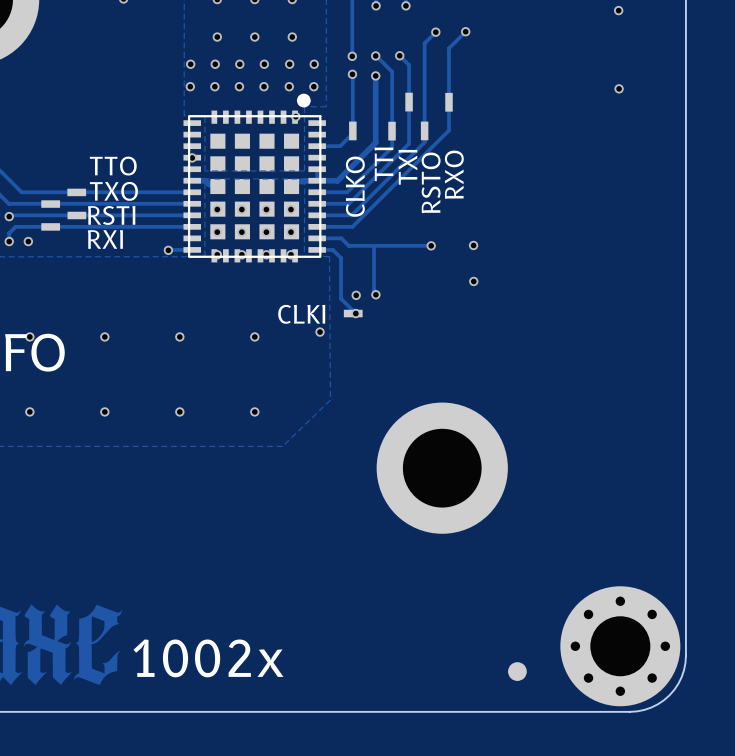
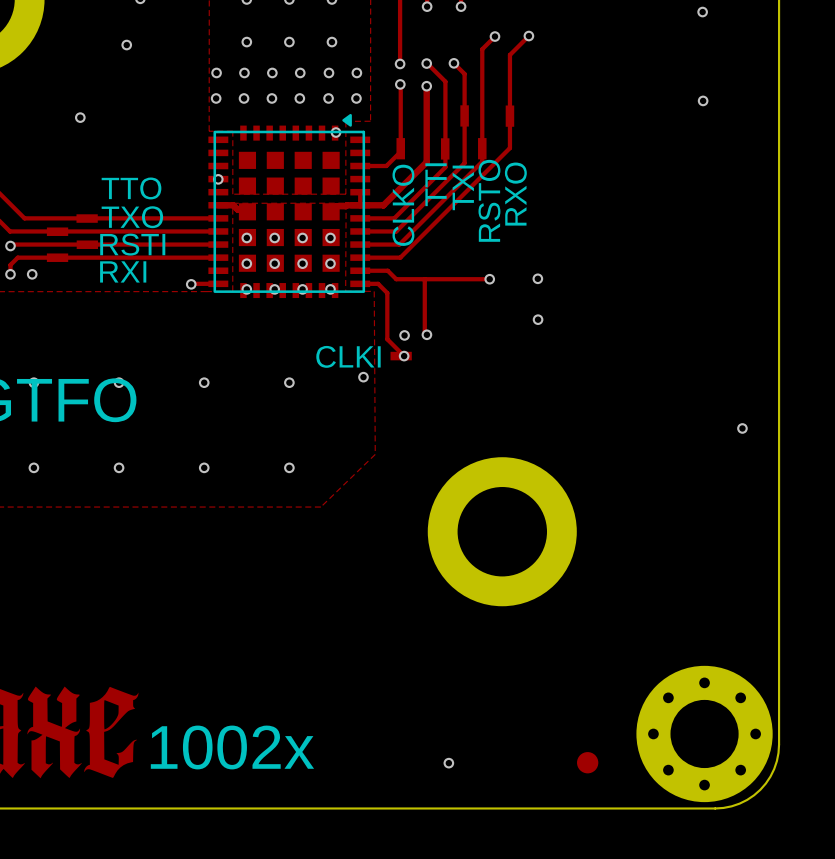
via: none -> (126, 45)
part footprint: [183, 93, 326, 263] -> [208, 113, 371, 299]
via: none -> (80, 117)
via: none -> (742, 428)
via: none -> (448, 763)

